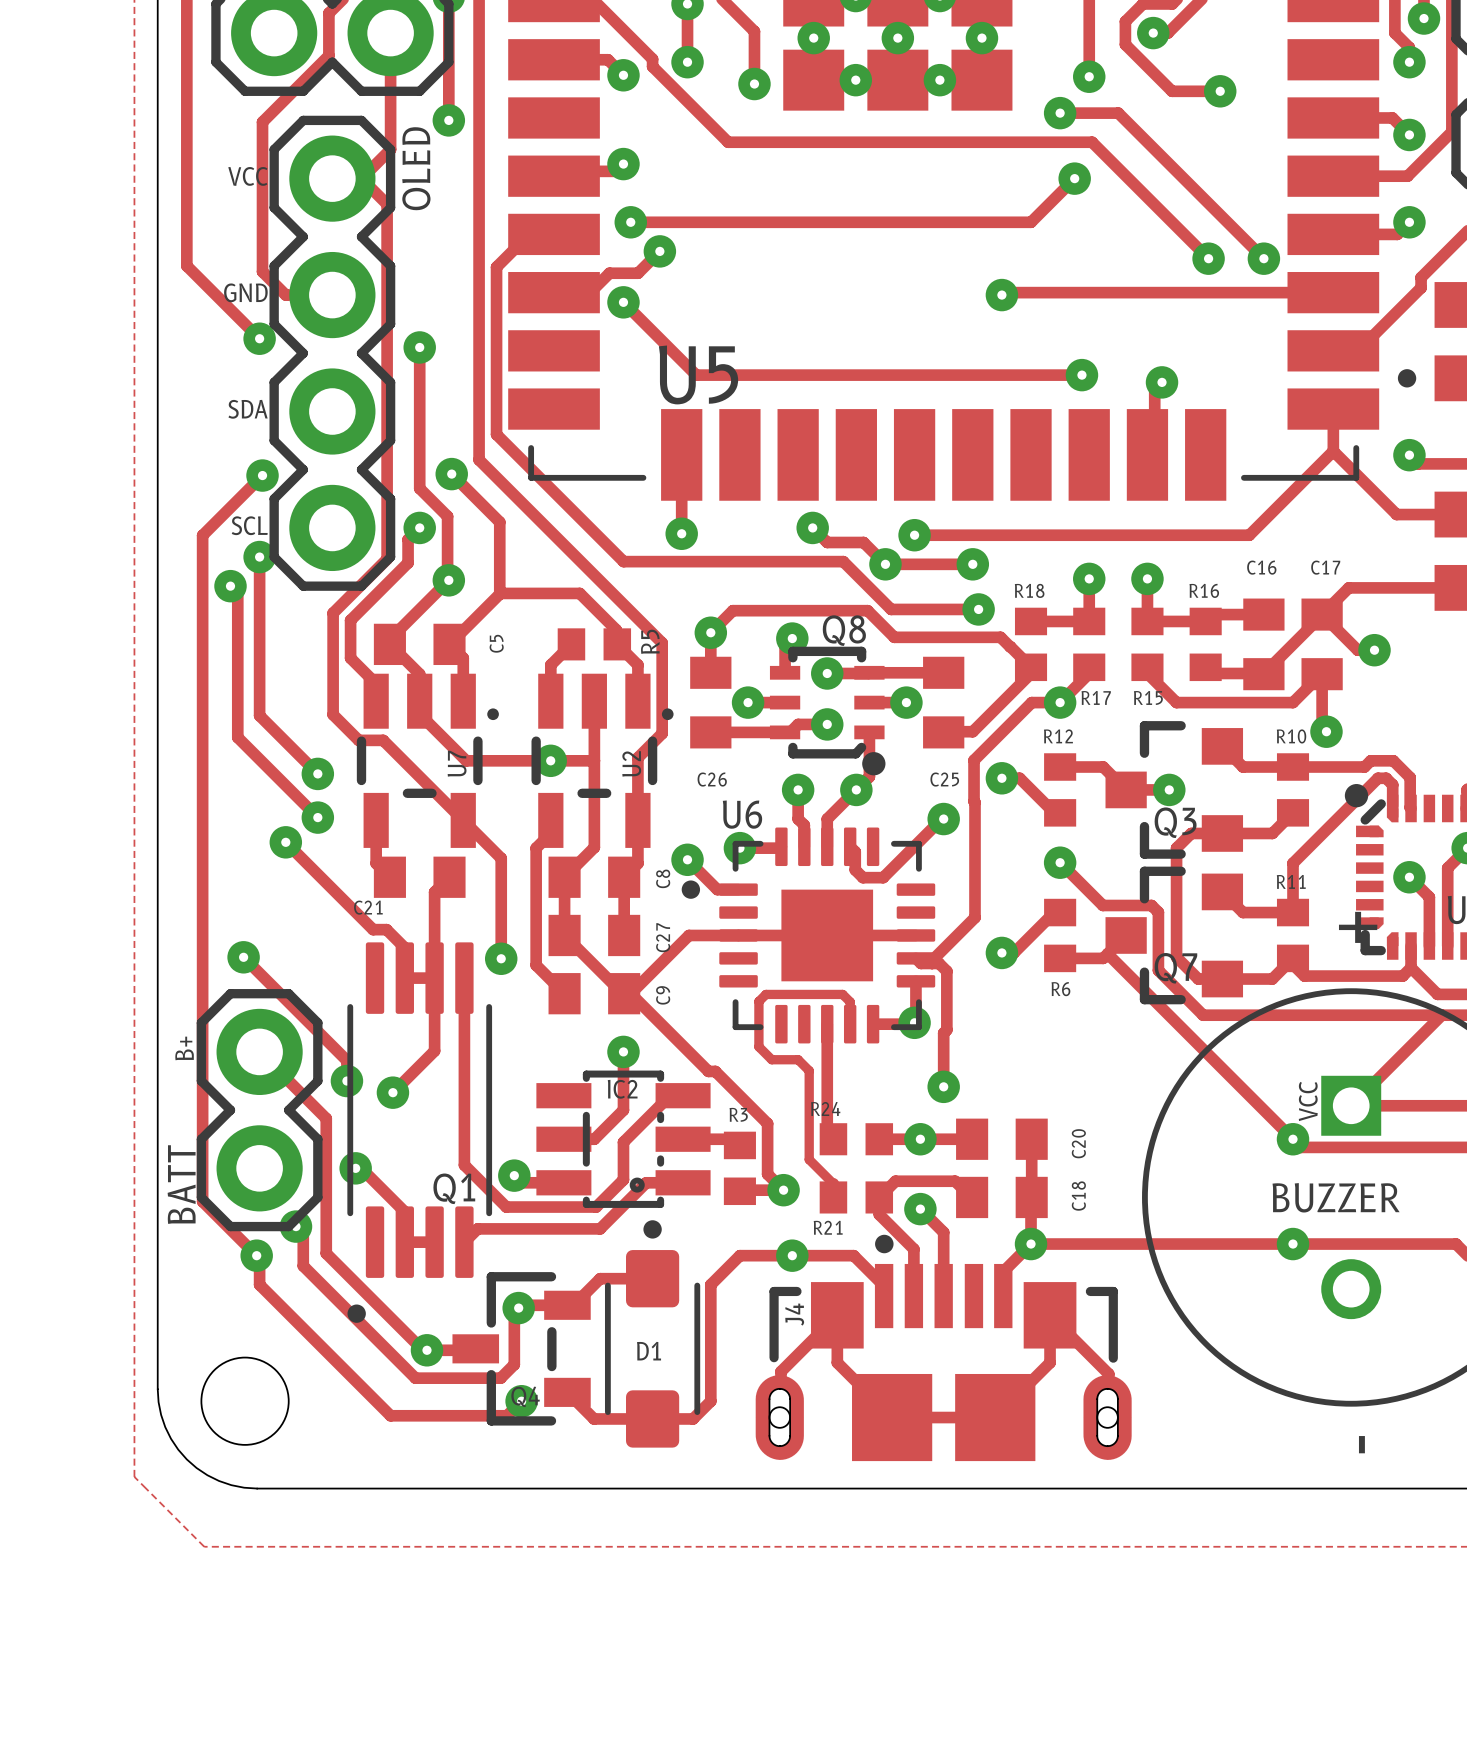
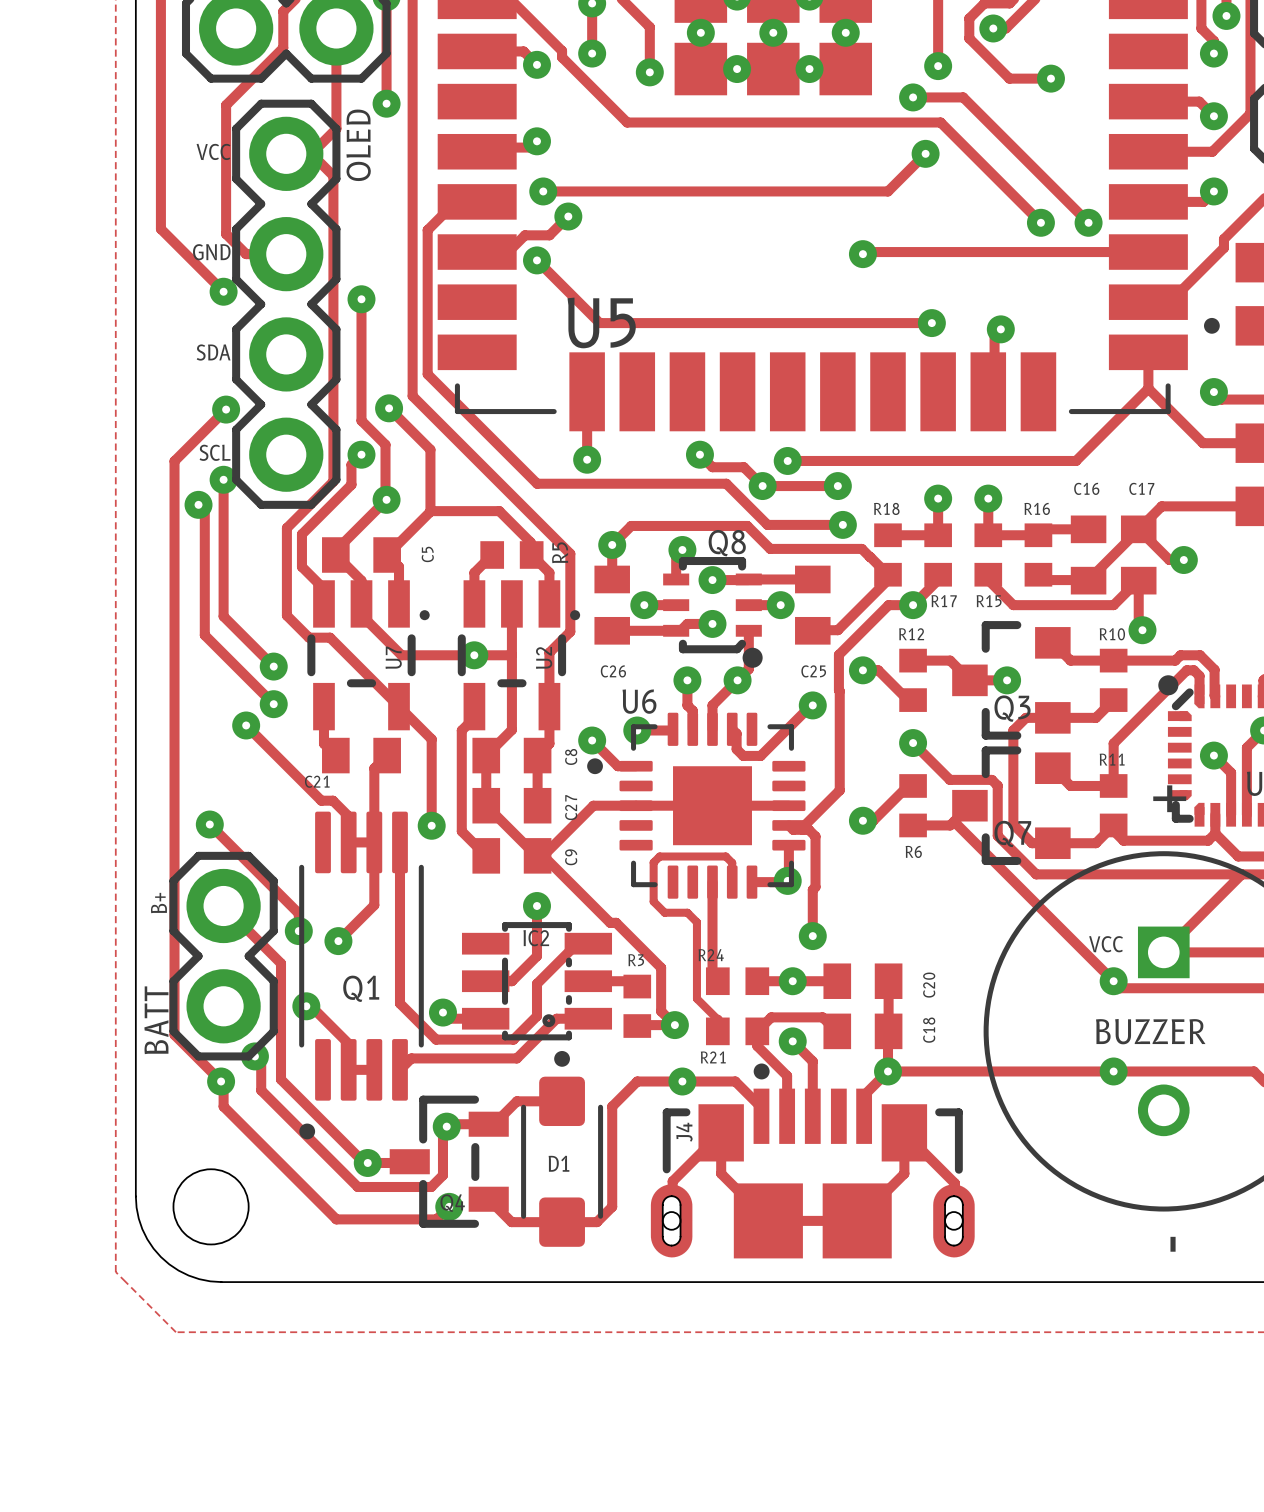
text rotation: 0° (1308, 1101) -> 90° clockwise (1106, 944)
Q1 name position: Q1 (454, 1188) -> Q1 (361, 988)

